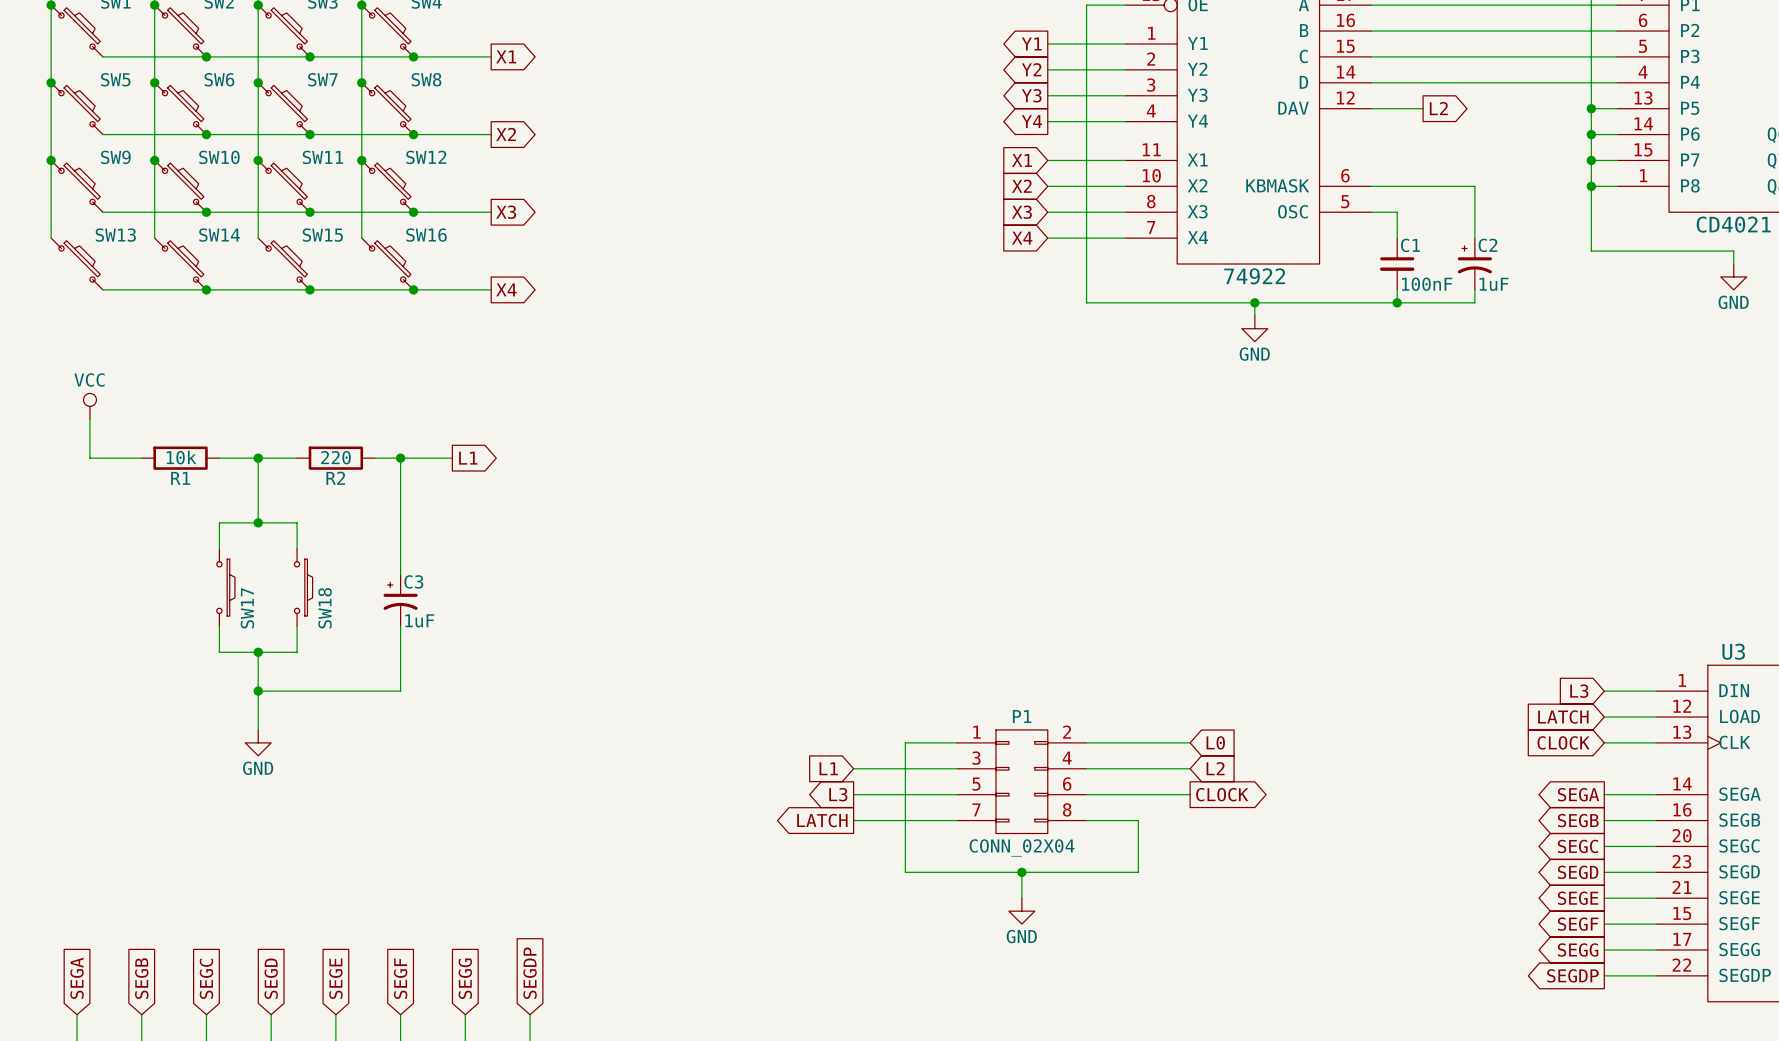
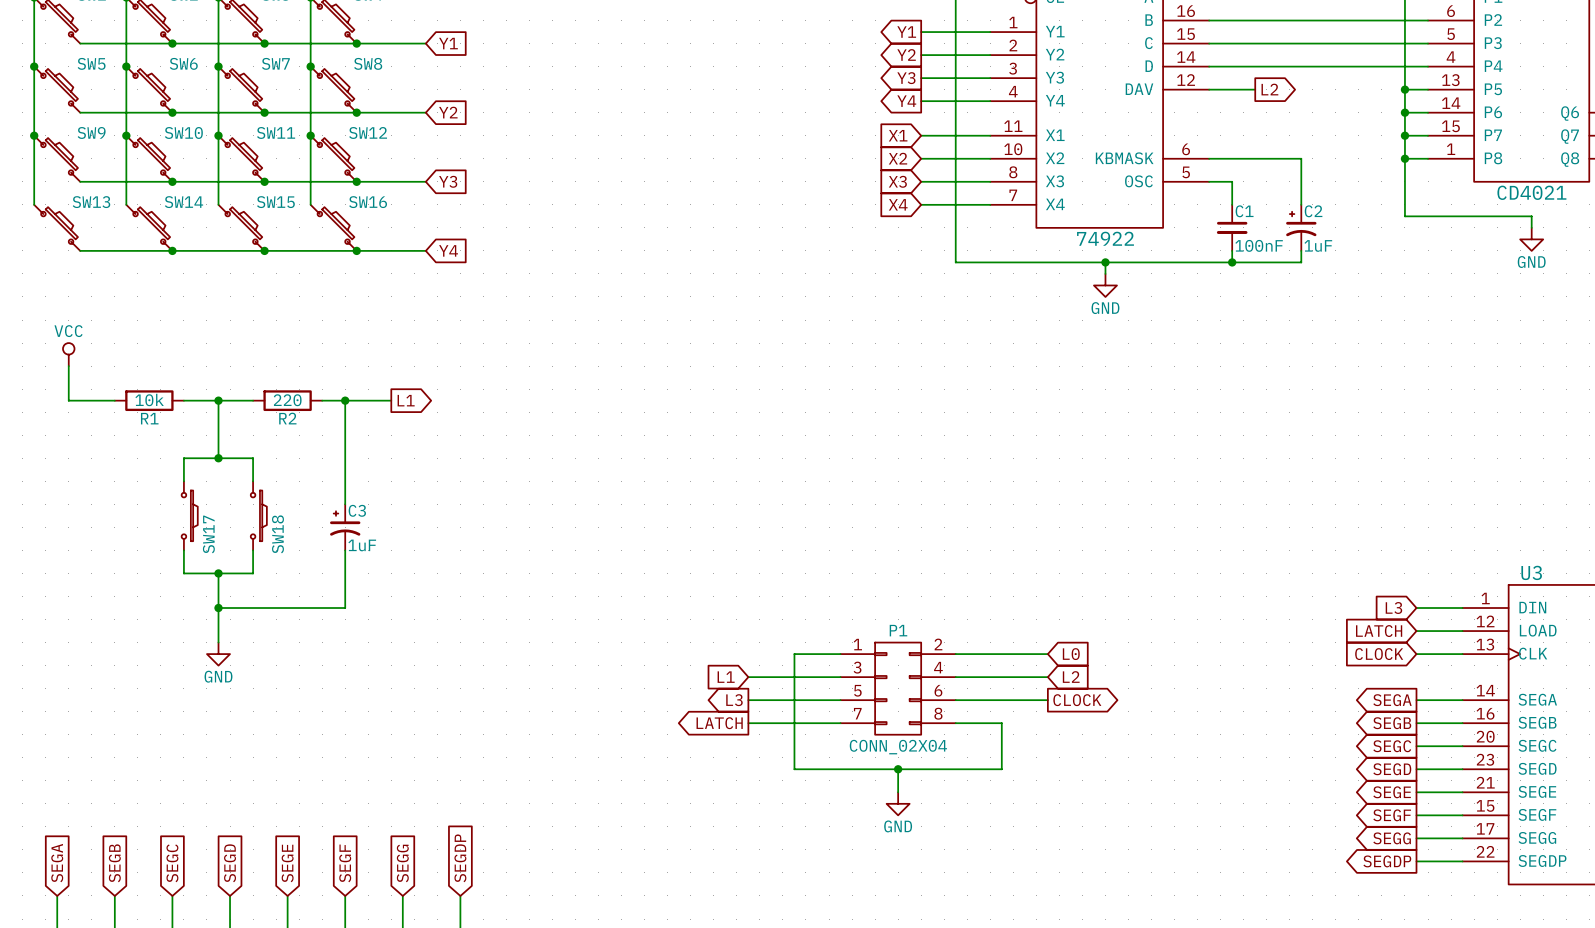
global label shape: output (506, 56) -> input (448, 43)
global label: X1 (506, 56) -> Y1 (448, 43)
global label shape: output (506, 134) -> input (448, 112)
global label: X2 (506, 134) -> Y2 (448, 112)
global label shape: output (506, 212) -> input (448, 181)
global label: X3 (506, 212) -> Y3 (448, 181)
global label shape: output (506, 289) -> input (448, 250)
global label: X4 (506, 289) -> Y4 (448, 250)

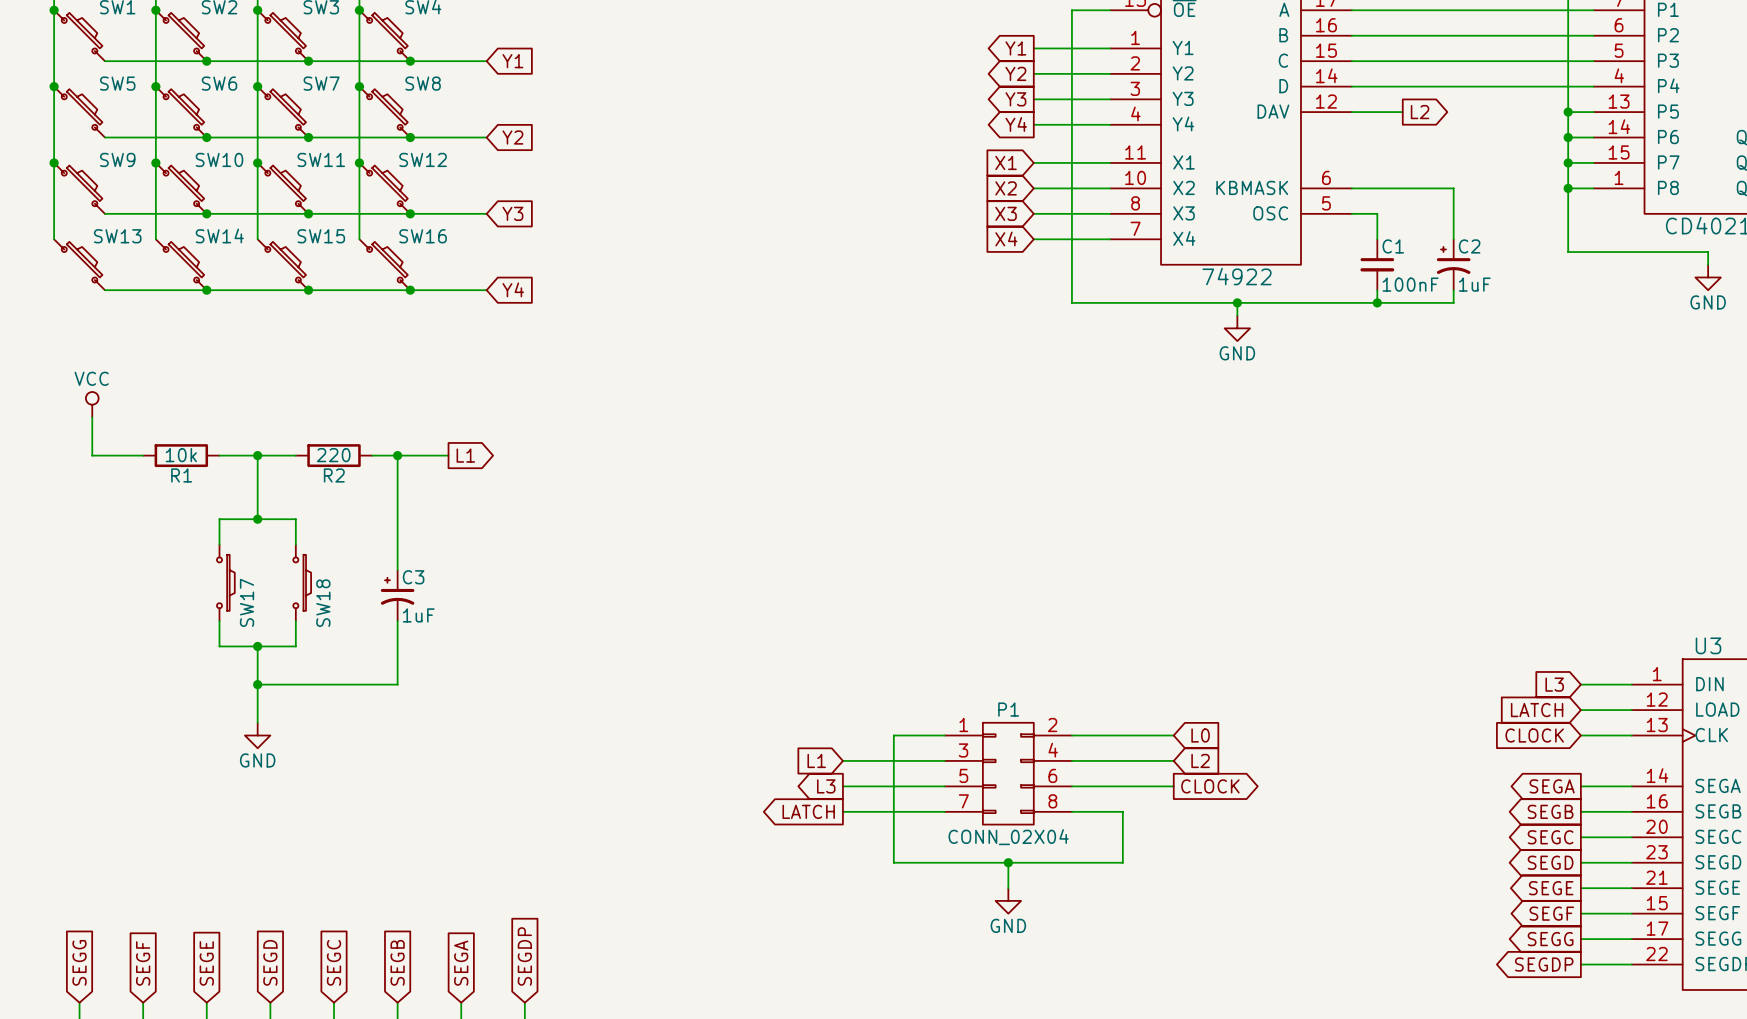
global label: SEGA (57, 863) -> SEGG (79, 962)
global label: SEGB (114, 863) -> SEGF (143, 963)
global label: SEGC (172, 863) -> SEGE (206, 963)
global label: SEGE (287, 863) -> SEGC (334, 962)
global label: SEGF (345, 863) -> SEGB (397, 962)
global label: SEGG (402, 863) -> SEGA (461, 963)

